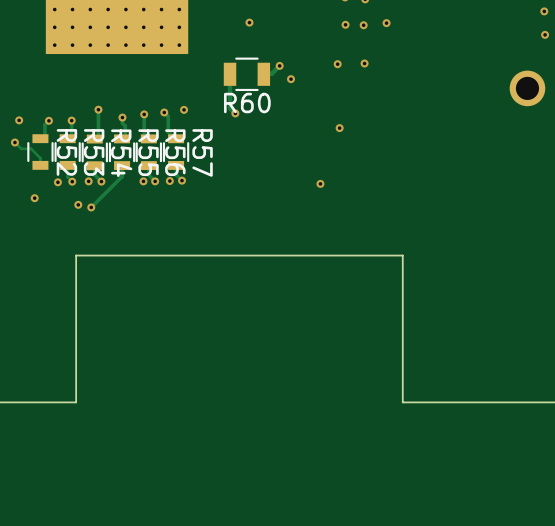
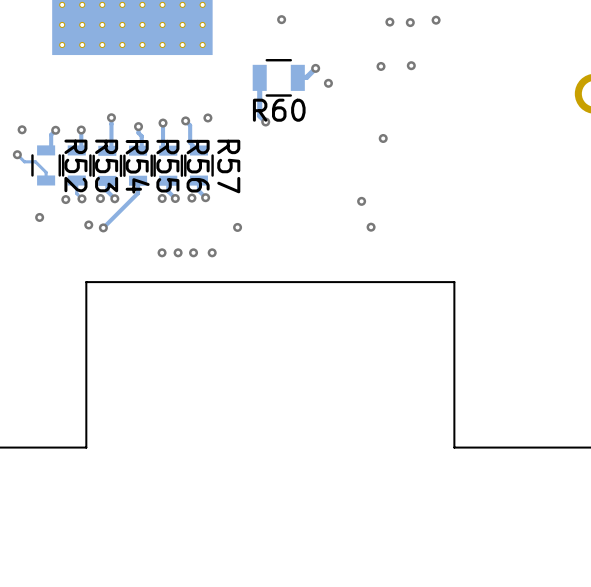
via: none -> (371, 227)
via: none -> (237, 227)
via: none -> (162, 252)
via: none -> (178, 252)
via: none -> (193, 252)
via: none -> (212, 252)

